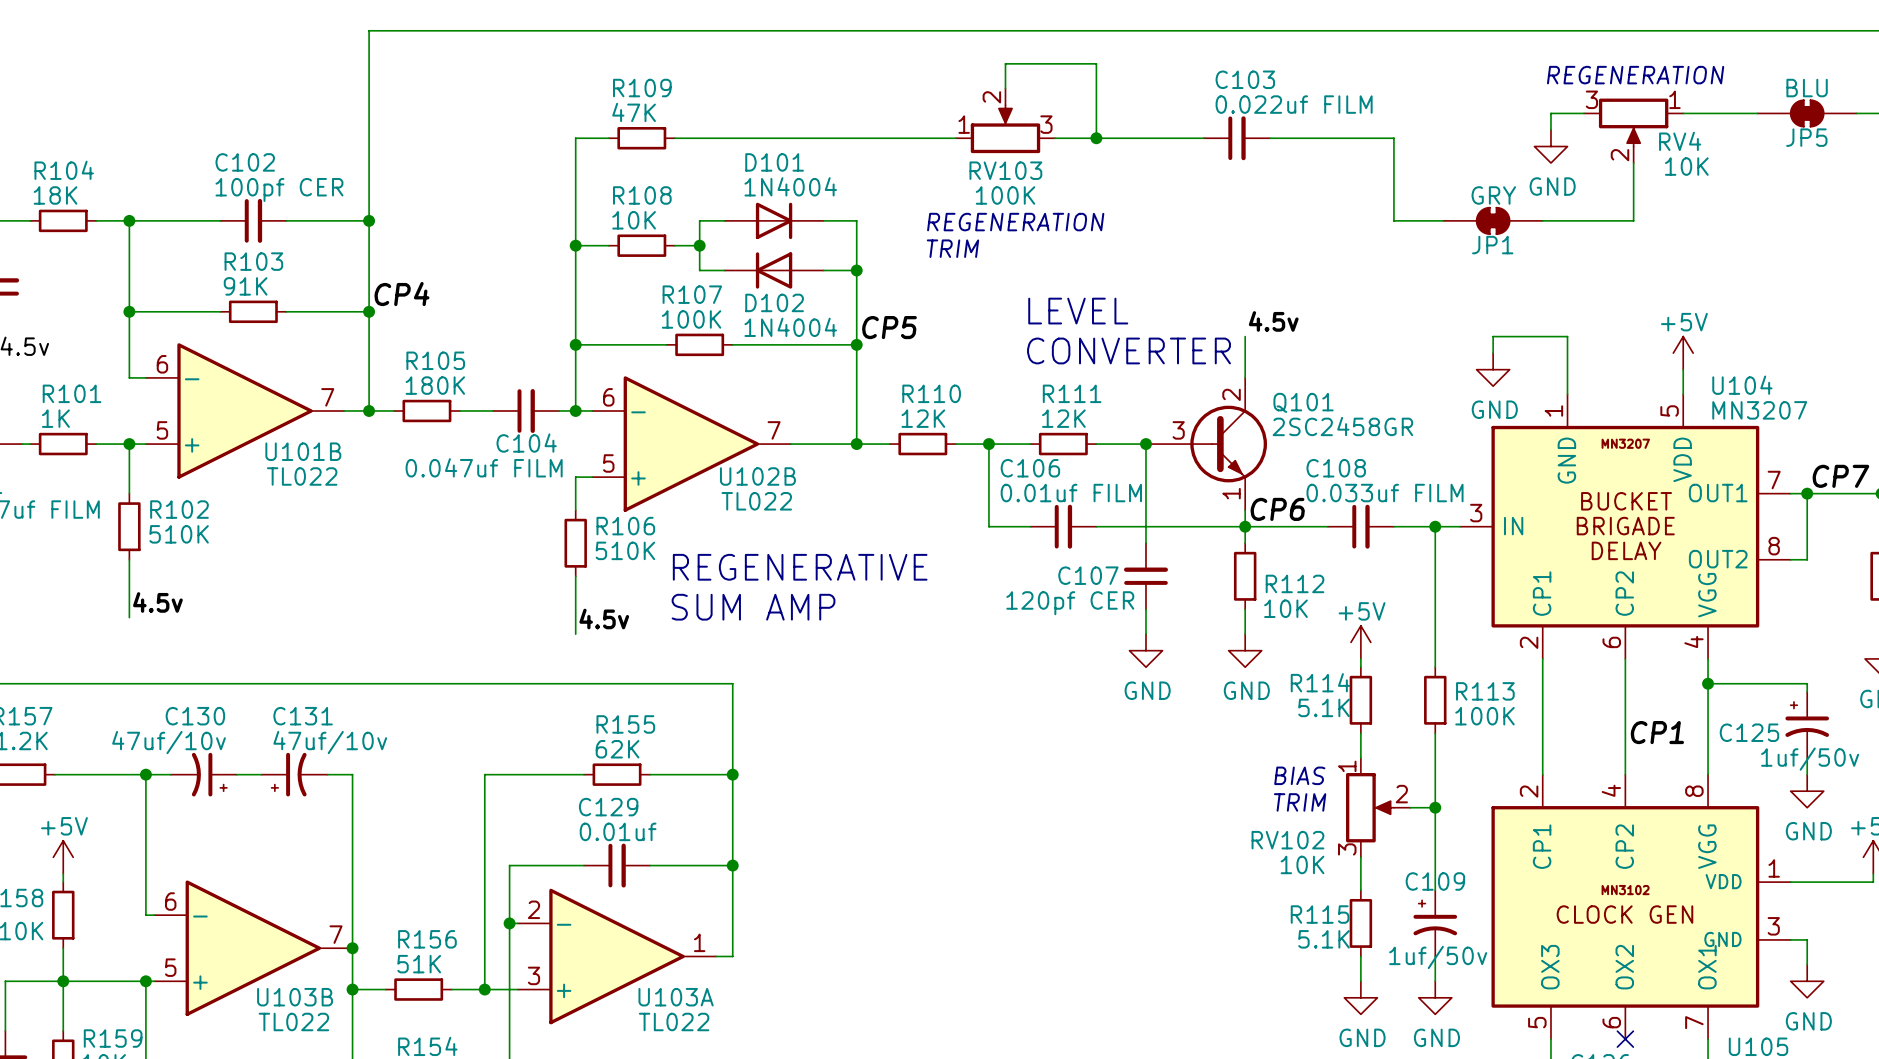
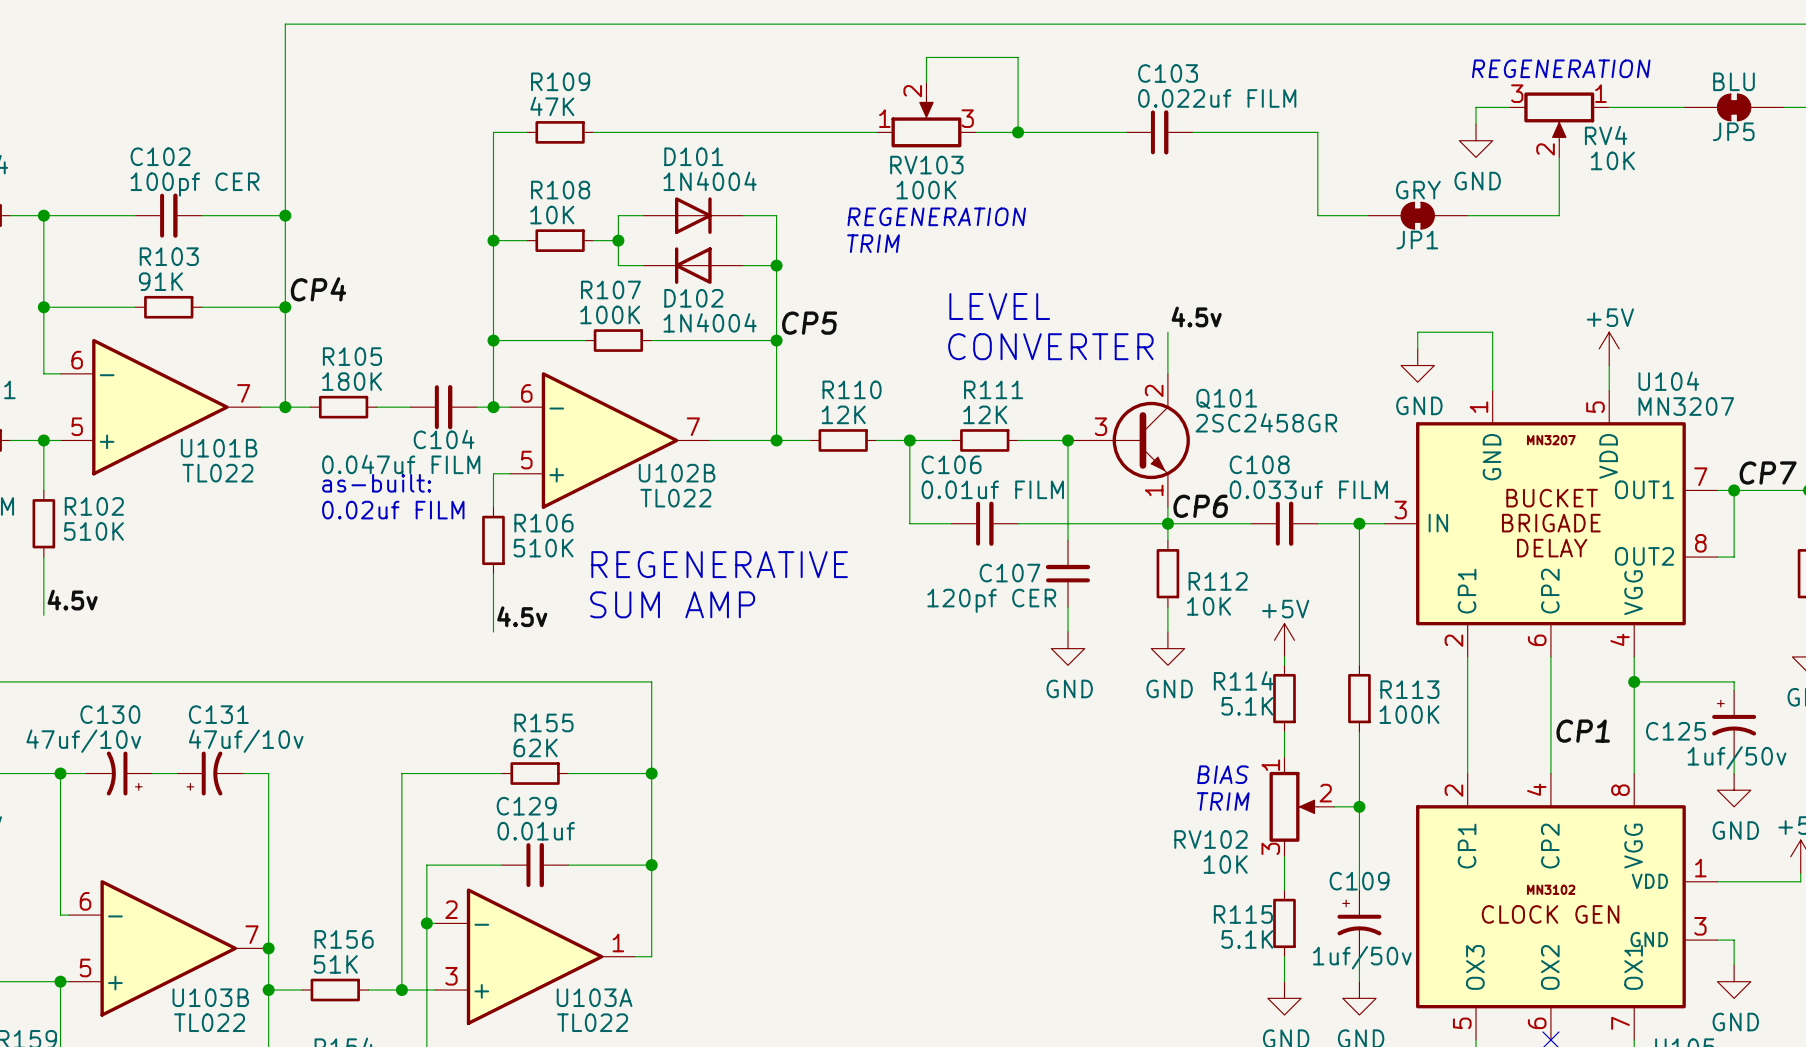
text: none -> as-built: (376, 483)
text: none -> 0.02uf FILM (393, 510)

